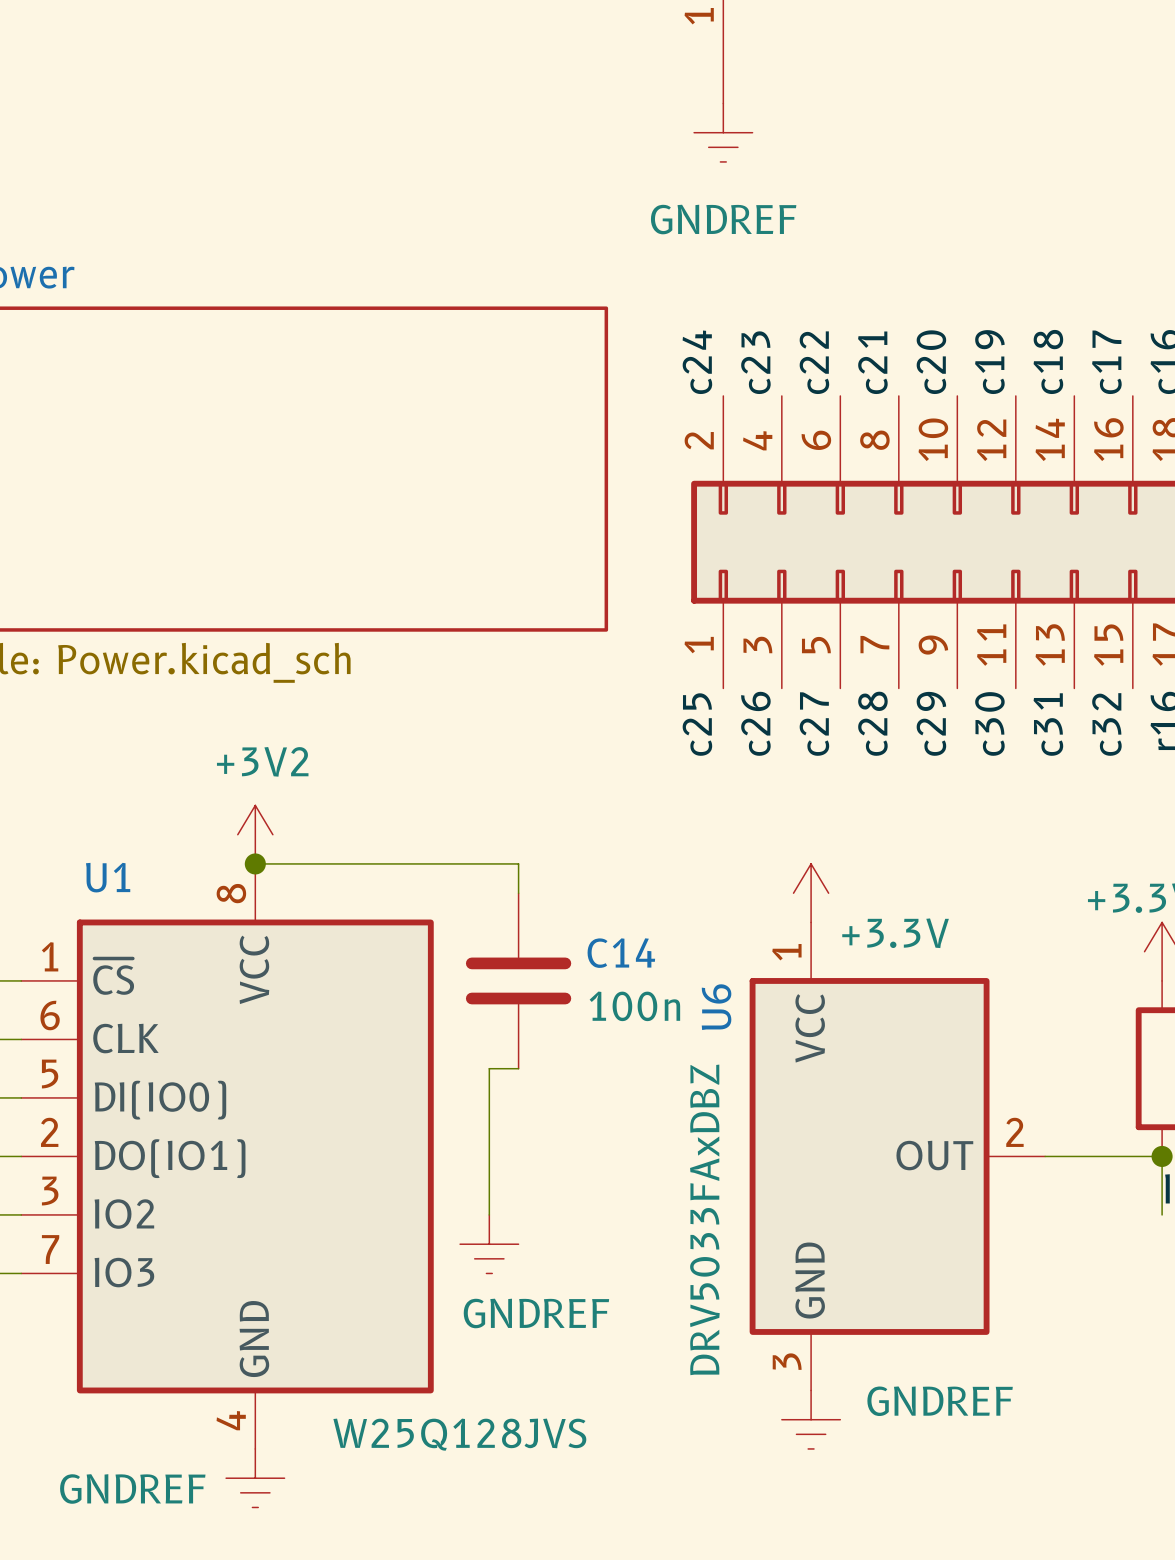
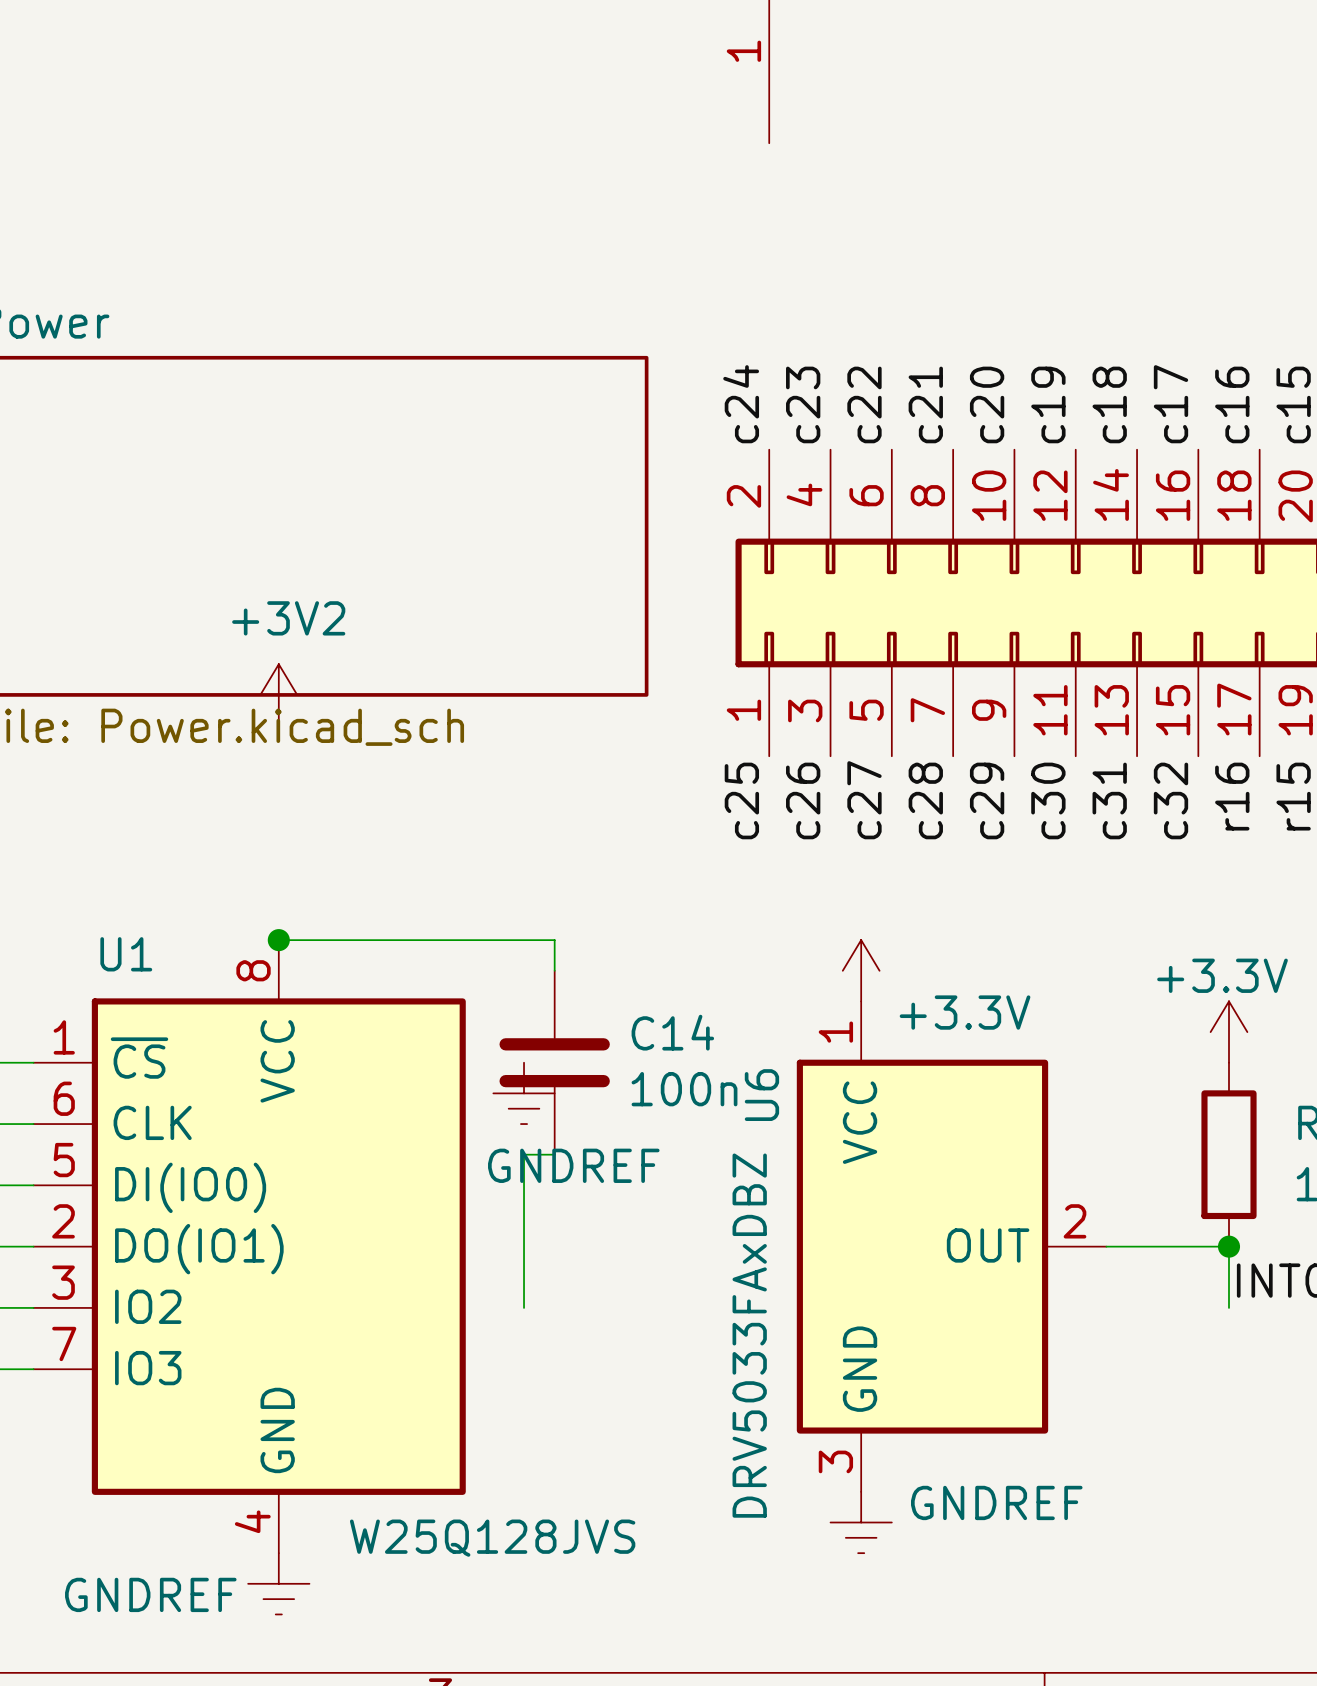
power symbol: GNDREF (723, 132) -> none
power symbol position: +3V2 (255, 834) -> +3V2 (278, 694)
power symbol position: GNDREF (489, 1244) -> GNDREF (524, 1093)

